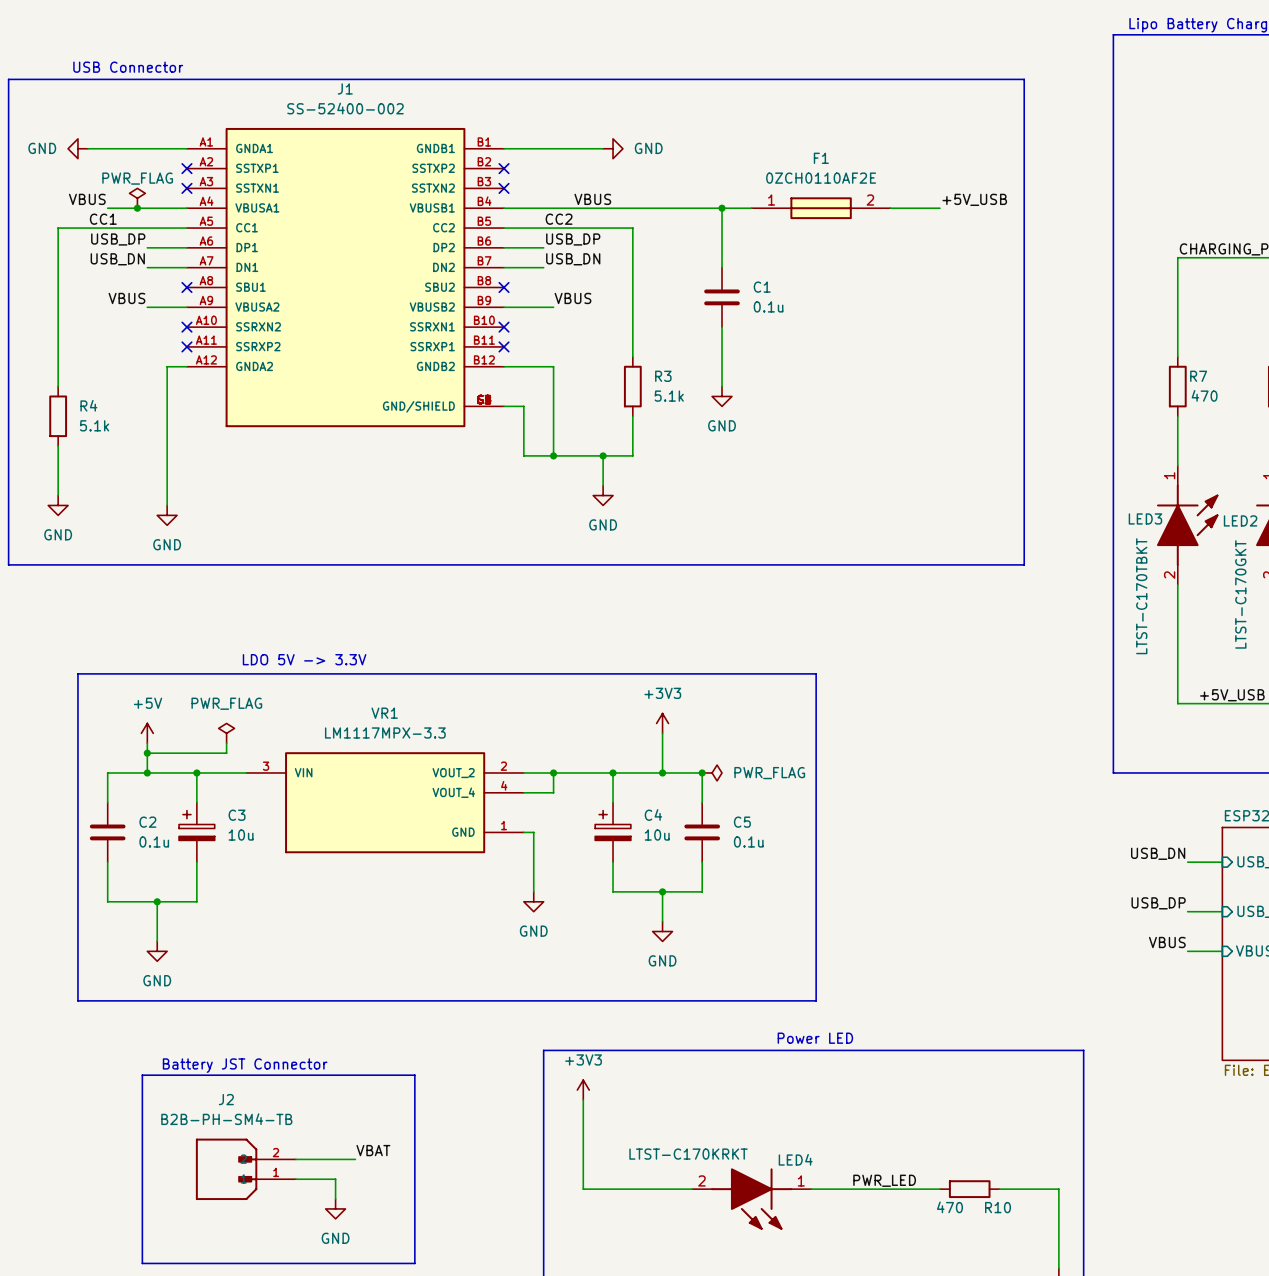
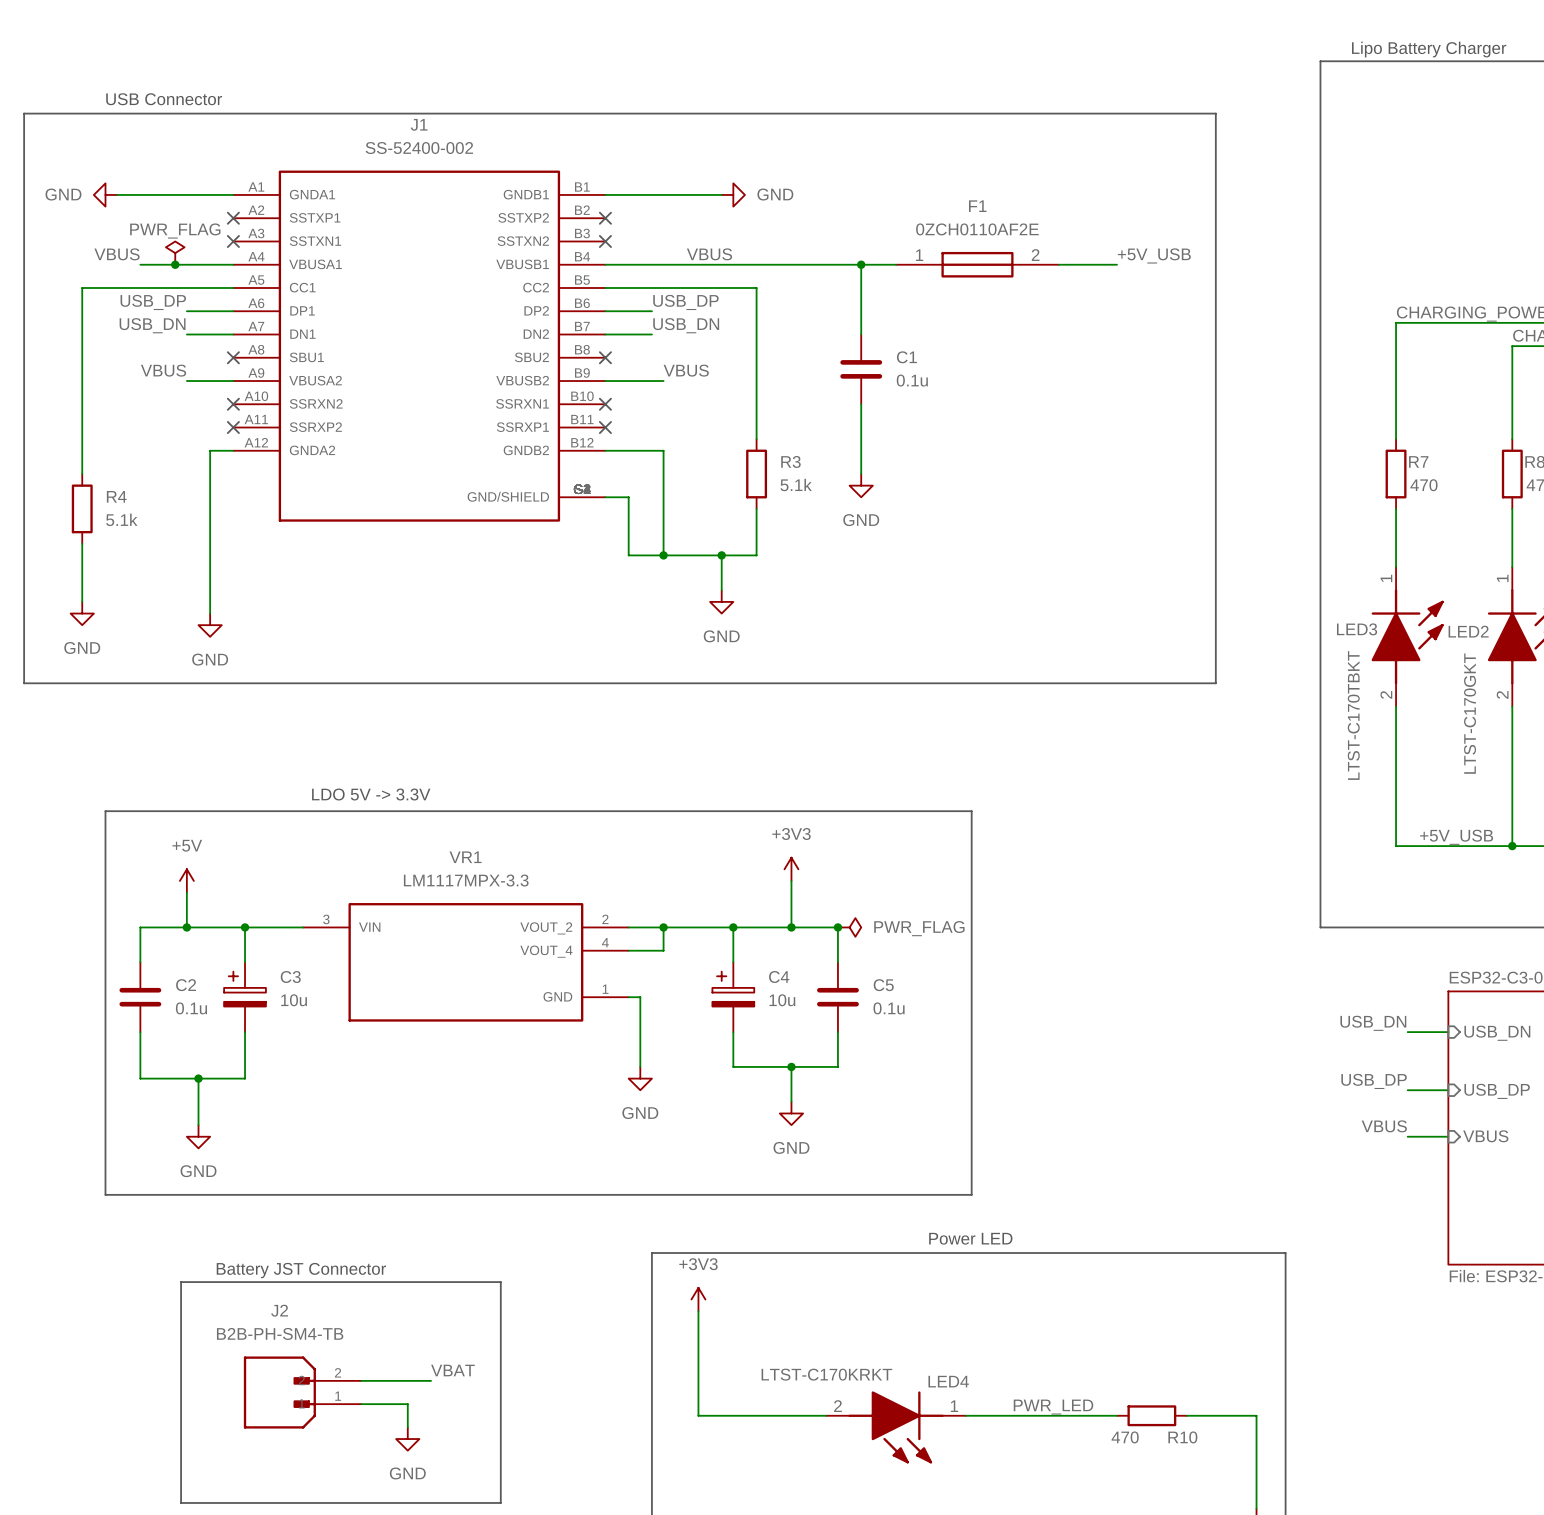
label: CC1 (103, 219) -> none
label: CC2 (559, 219) -> none
power symbol: PWR_FLAG (226, 733) -> none
wire: (226, 743) (226, 753) (147, 753) -> none
junction: (147, 753) -> none

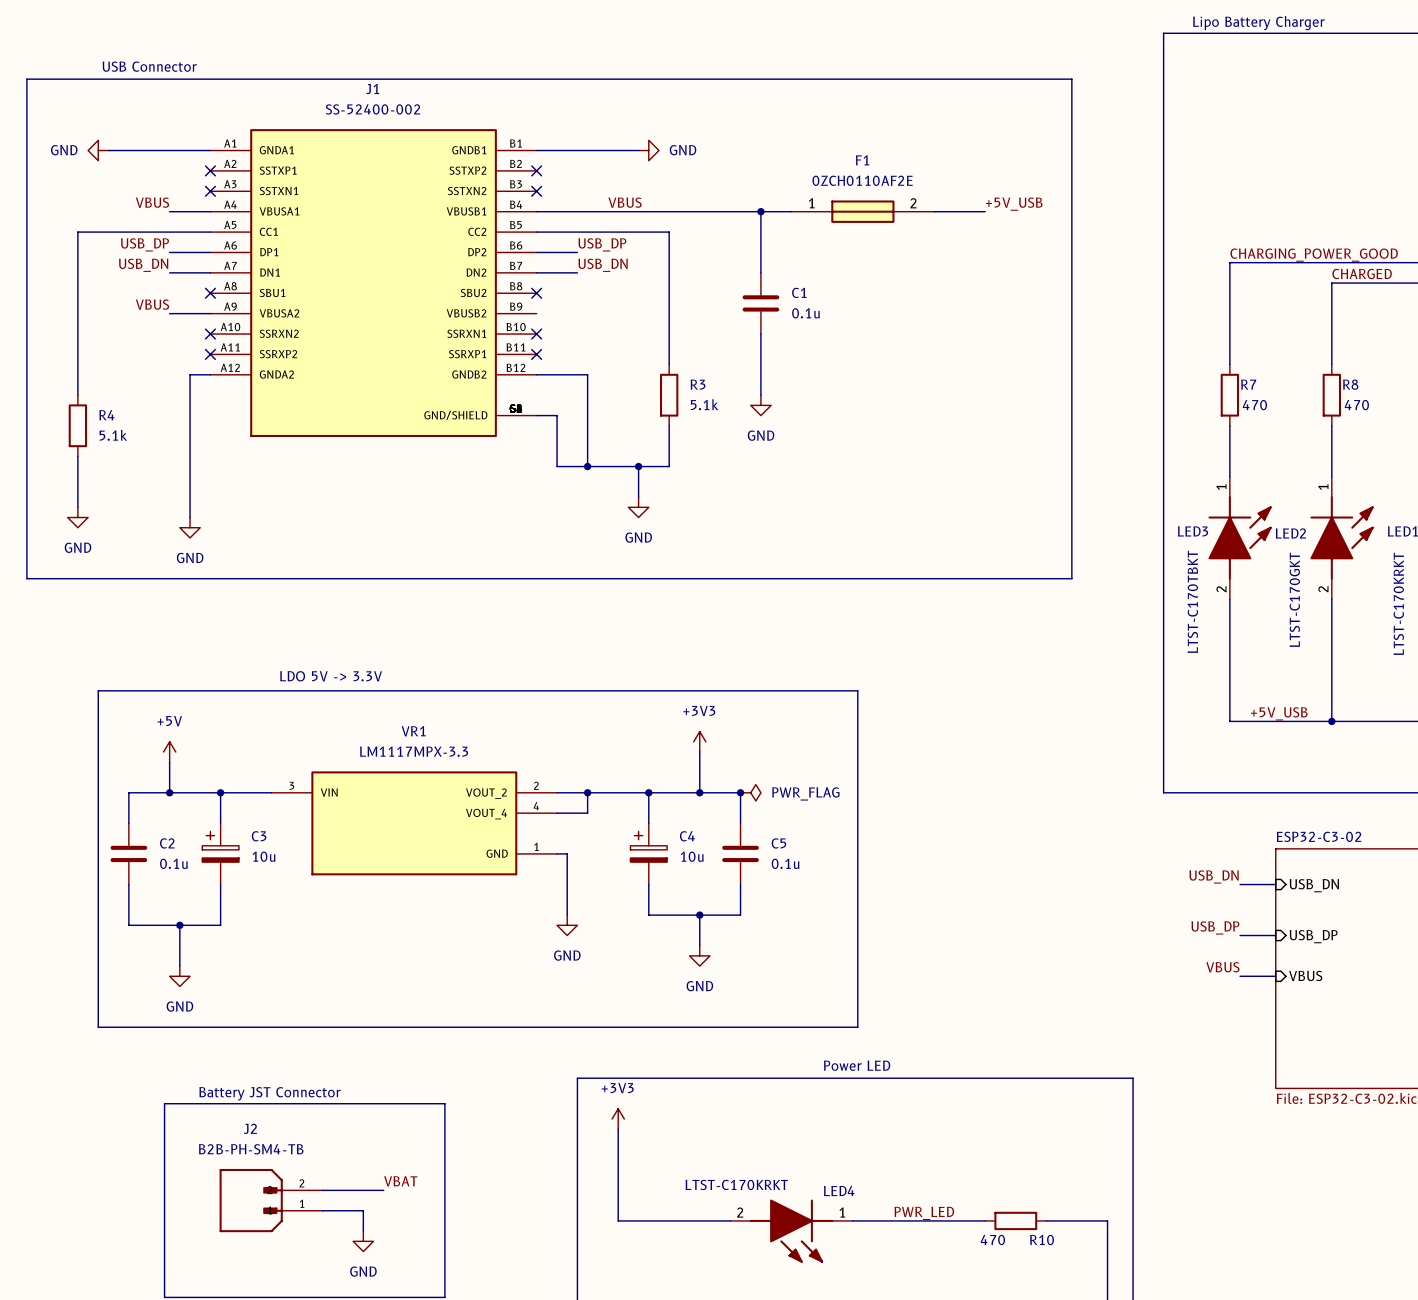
power symbol: PWR_FLAG (175, 253) -> none
label position: VBUS (117, 254) -> VBUS (152, 202)
wire: (140, 264) (186, 264) -> none
junction: (175, 264) -> none
label: VBUS (686, 370) -> none
wire: (605, 381) (663, 381) -> none

